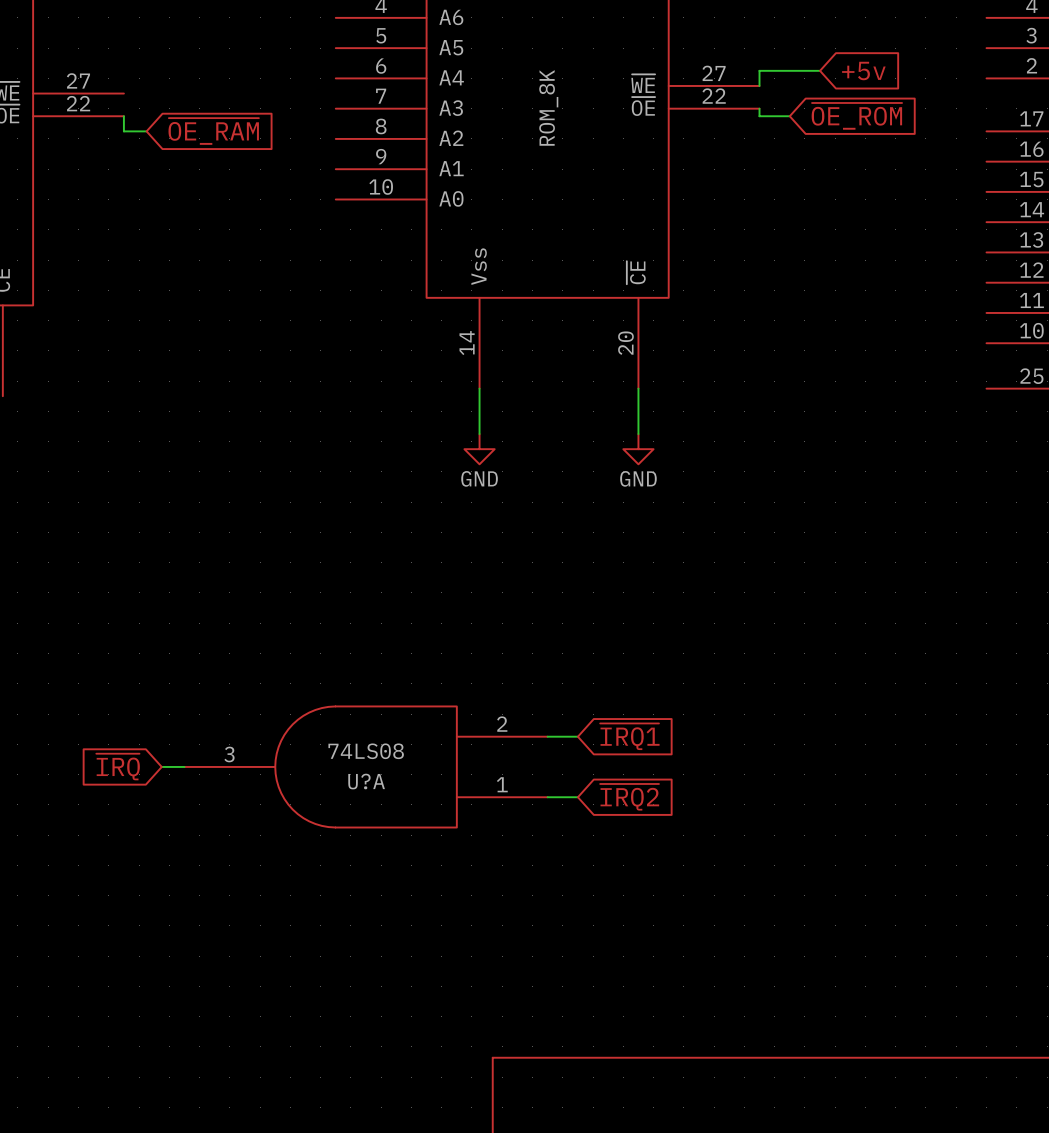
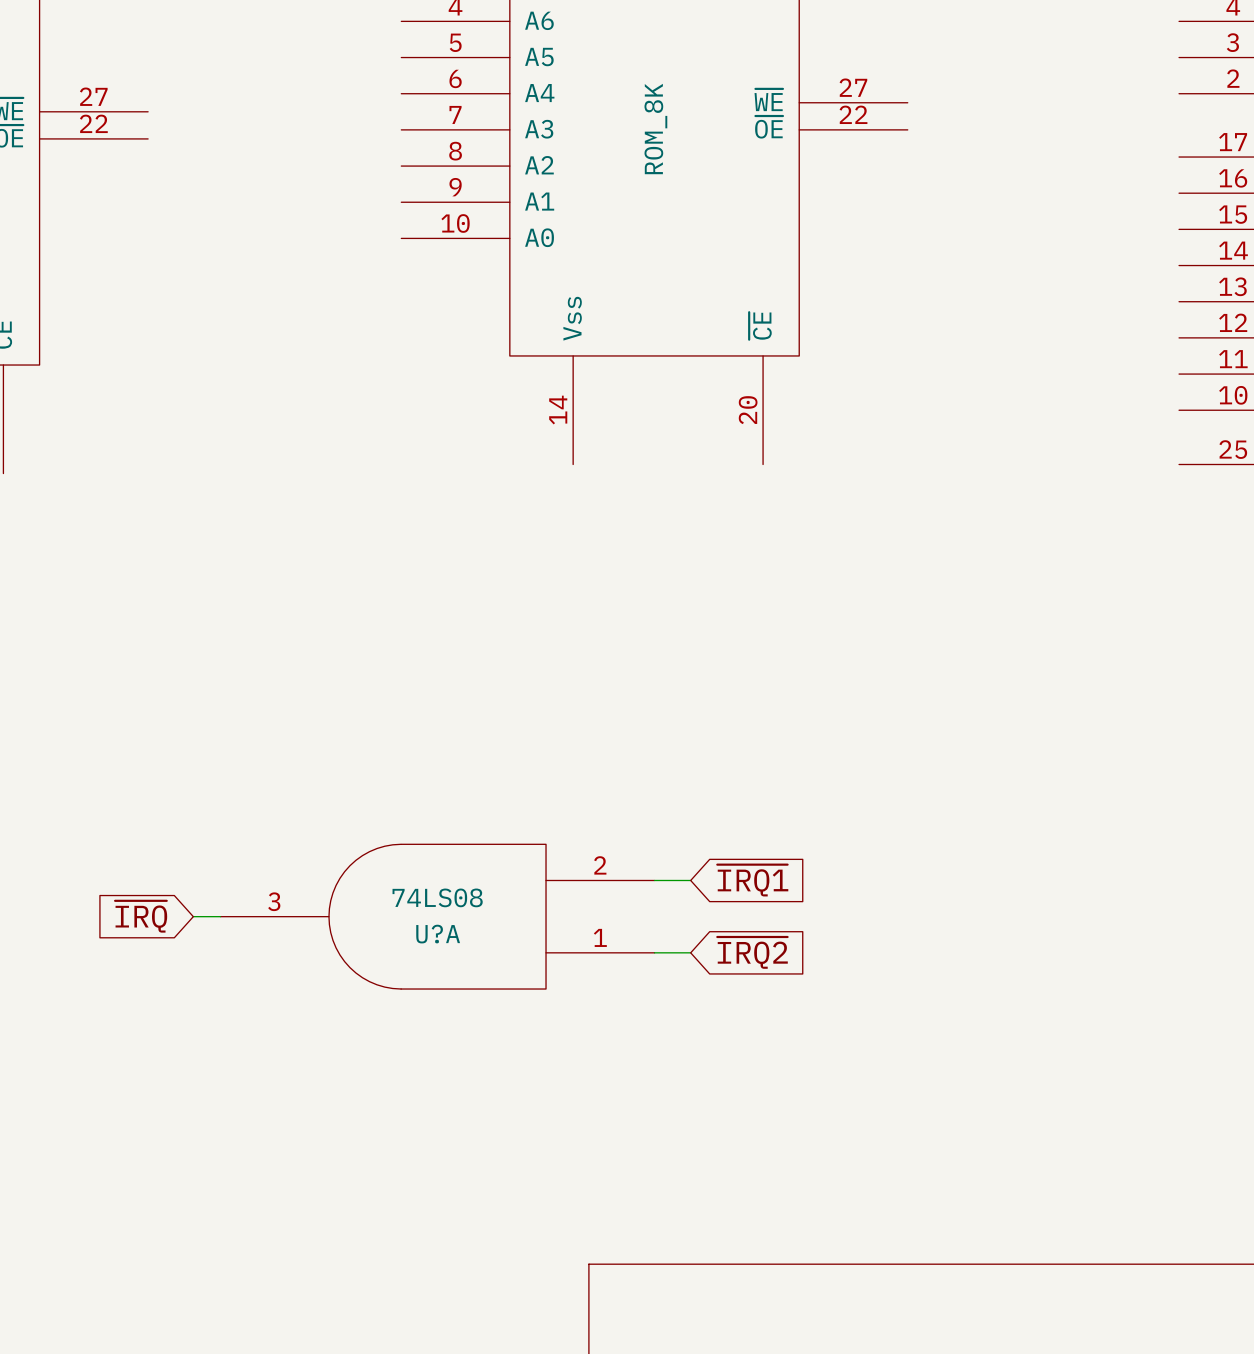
wire: (820, 70) (759, 70) (759, 85) -> none
global label: +5v (863, 71) -> none
wire: (759, 108) (759, 116) (789, 116) -> none
wire: (123, 116) (123, 131) (146, 131) -> none
global label: ~{OE_ROM} (856, 116) -> none
global label: ~{OE_RAM} (213, 131) -> none
wire: (479, 388) (479, 434) -> none
wire: (638, 388) (638, 434) -> none
power symbol: GND (479, 449) -> none
power symbol: GND (638, 449) -> none

